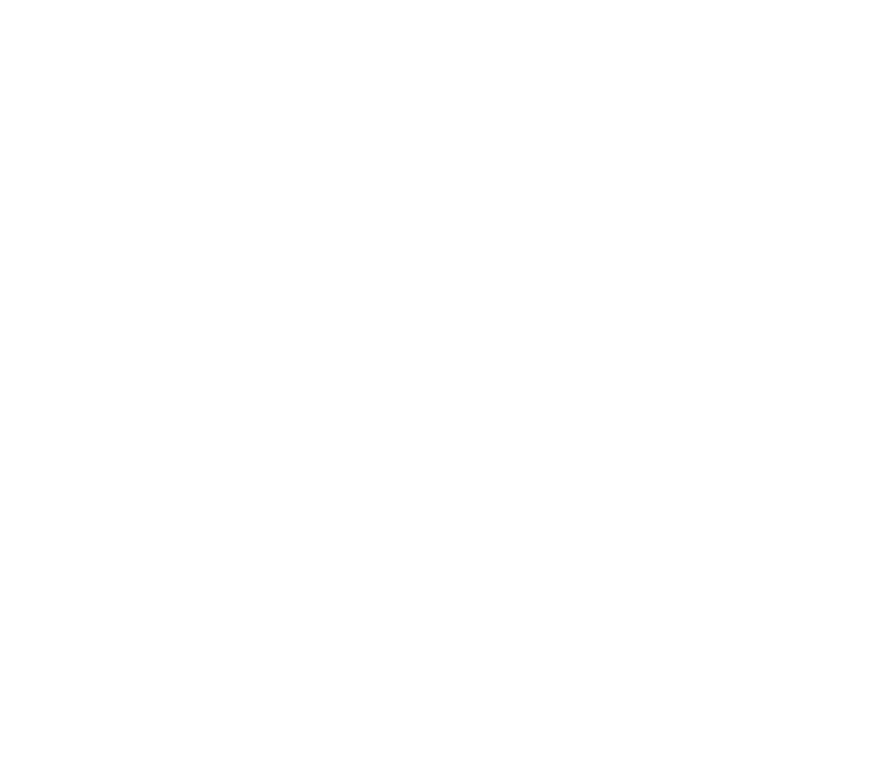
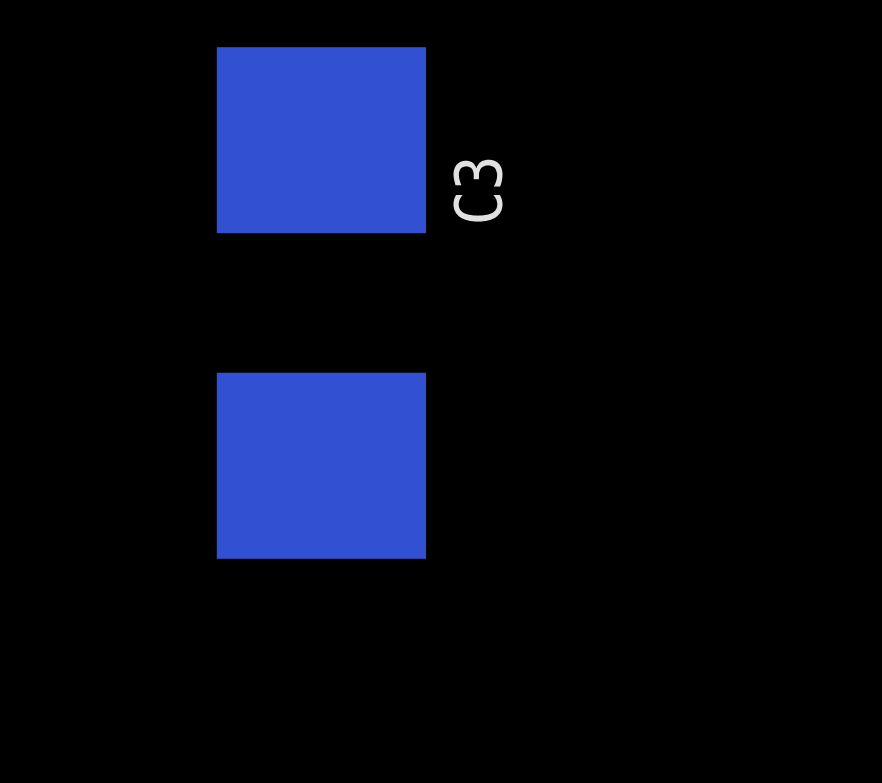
C3: none -> (321, 302)

